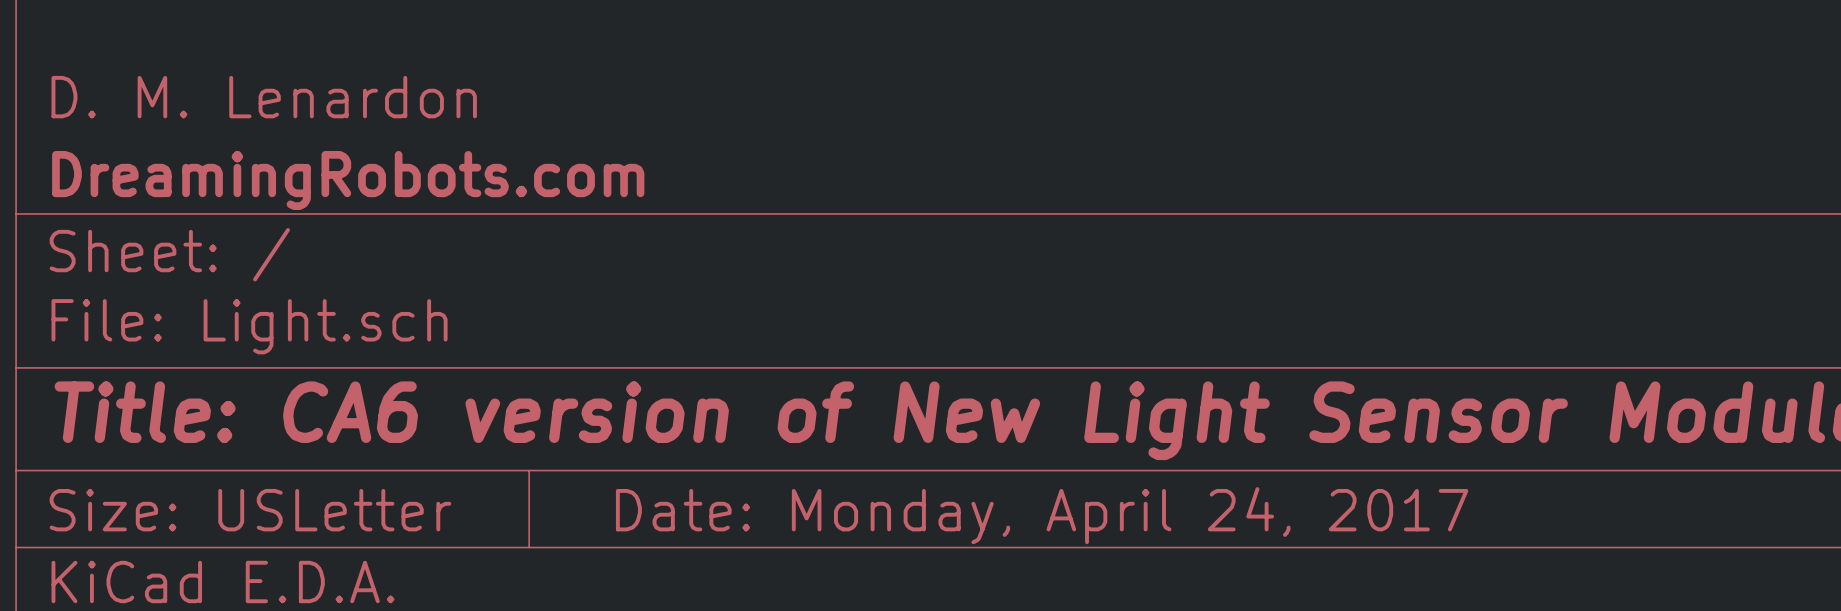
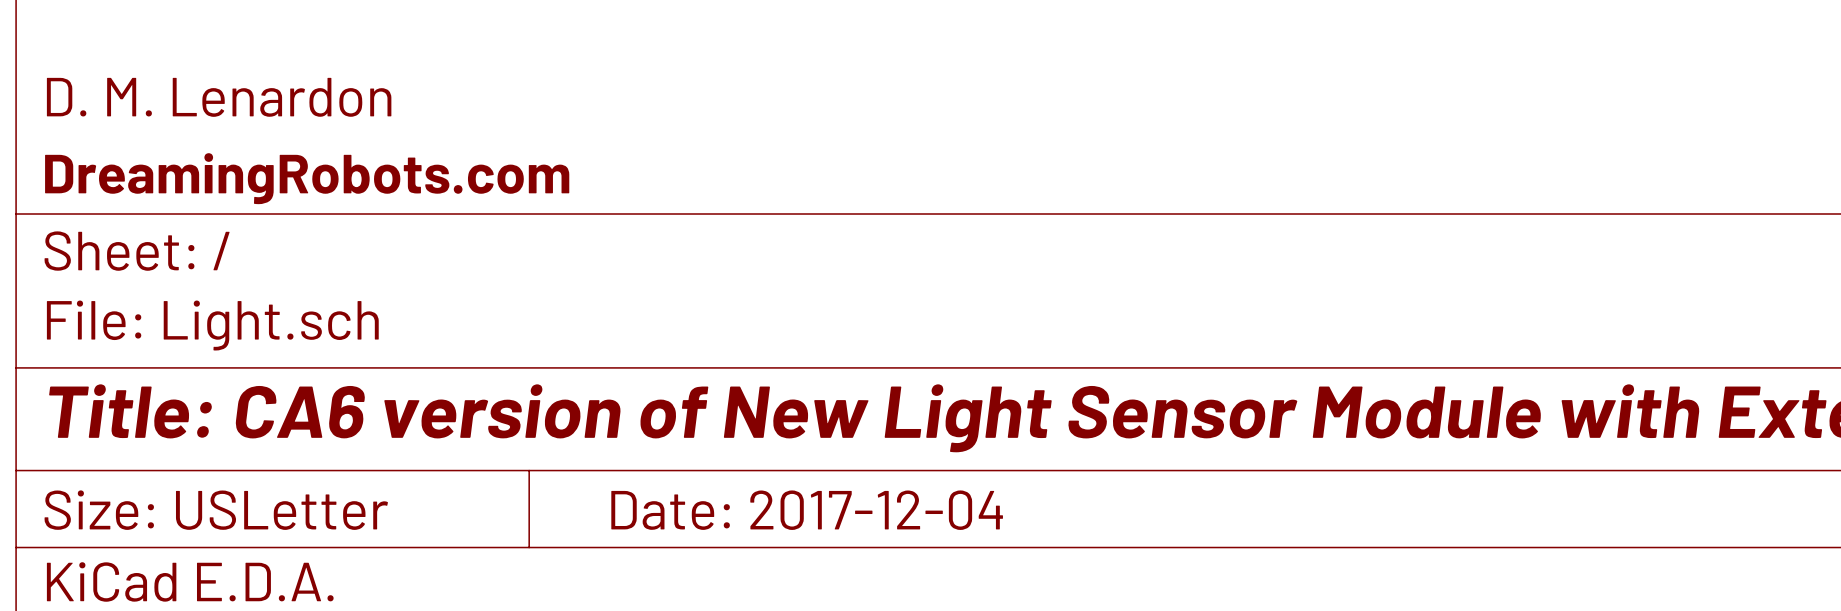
title block: Date: Monday, April 24, 2017 (1042, 515) -> Date: 2017-12-04 (807, 510)

